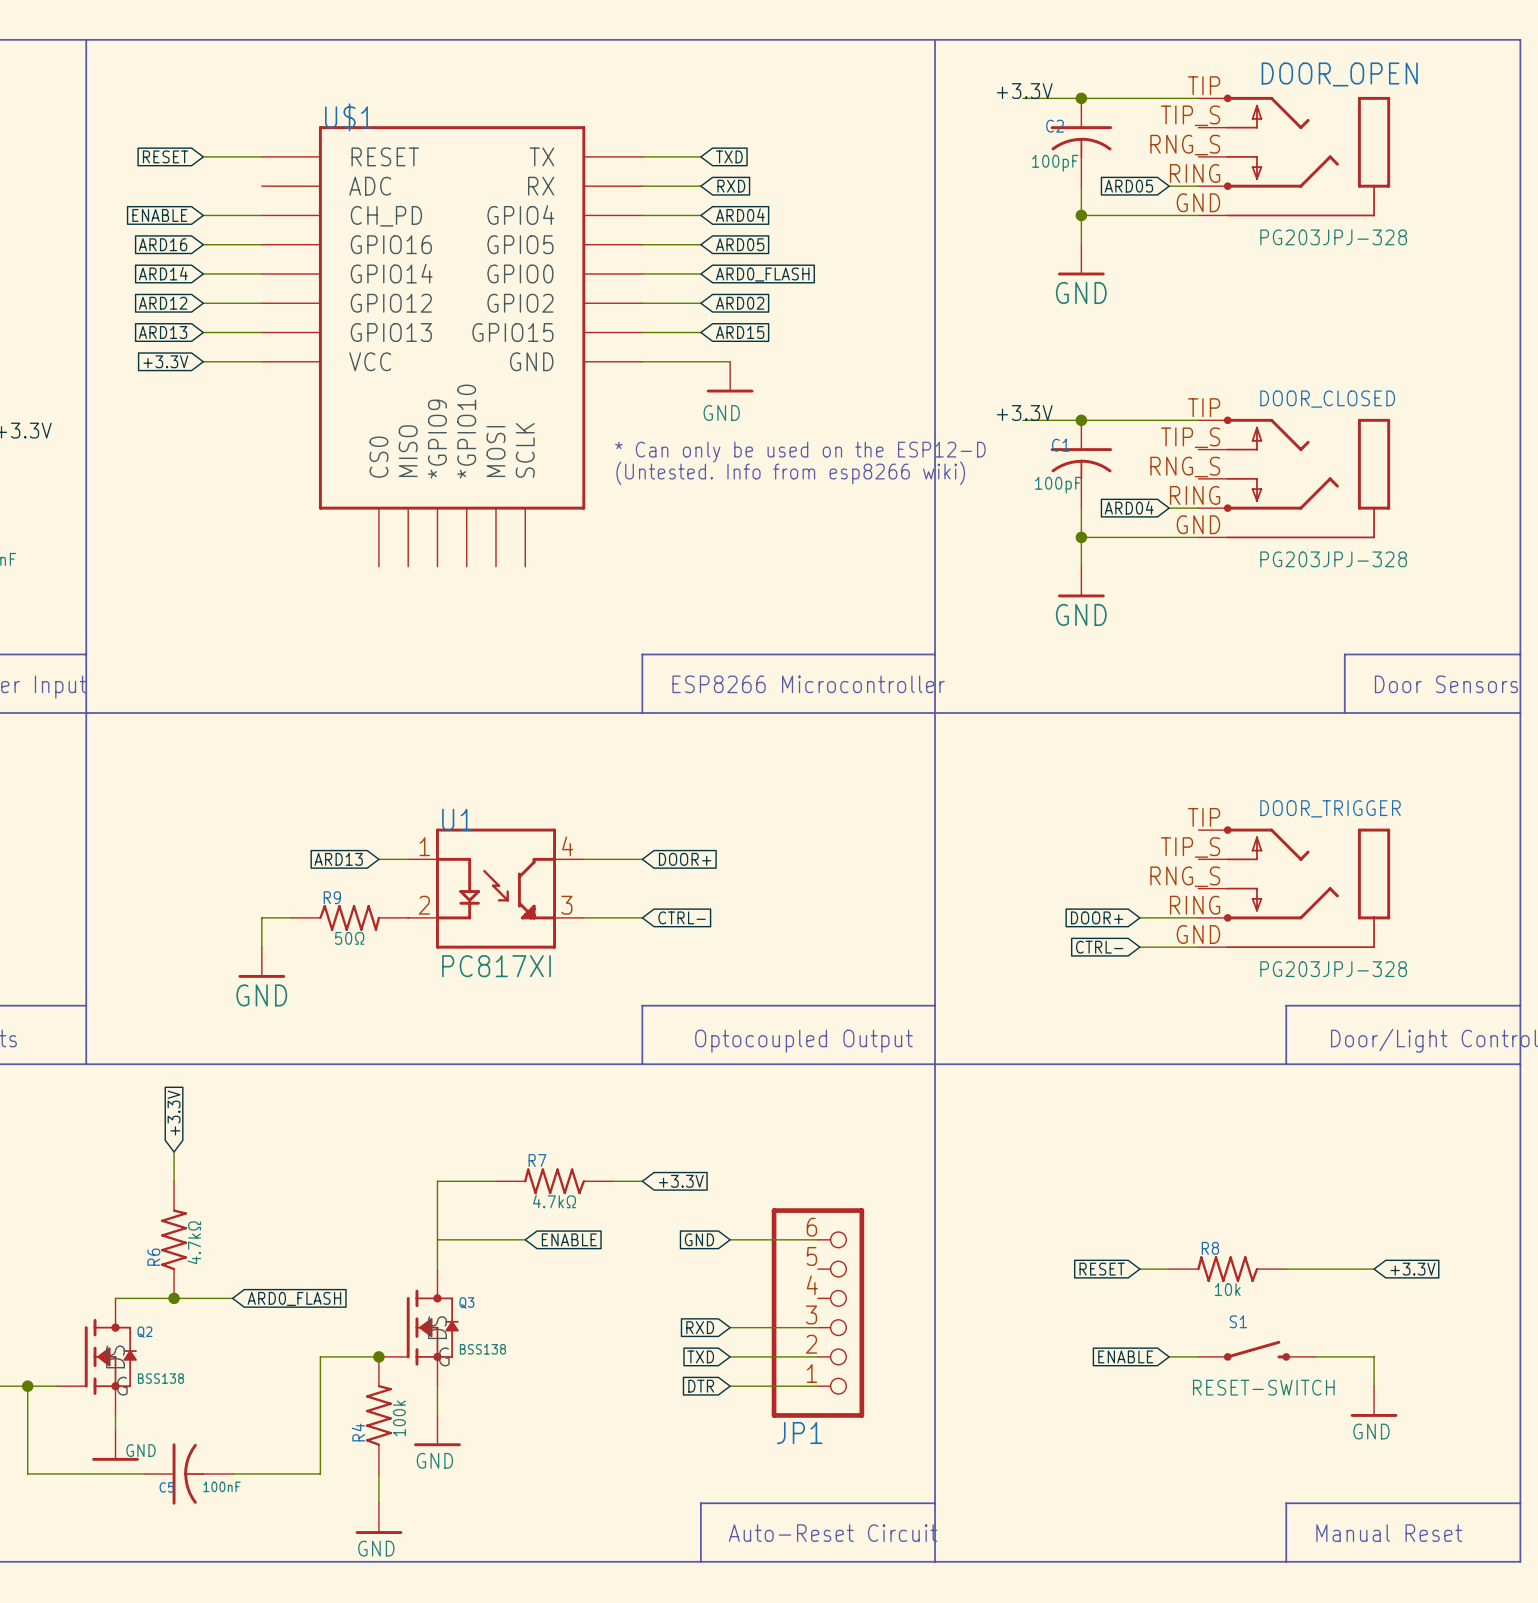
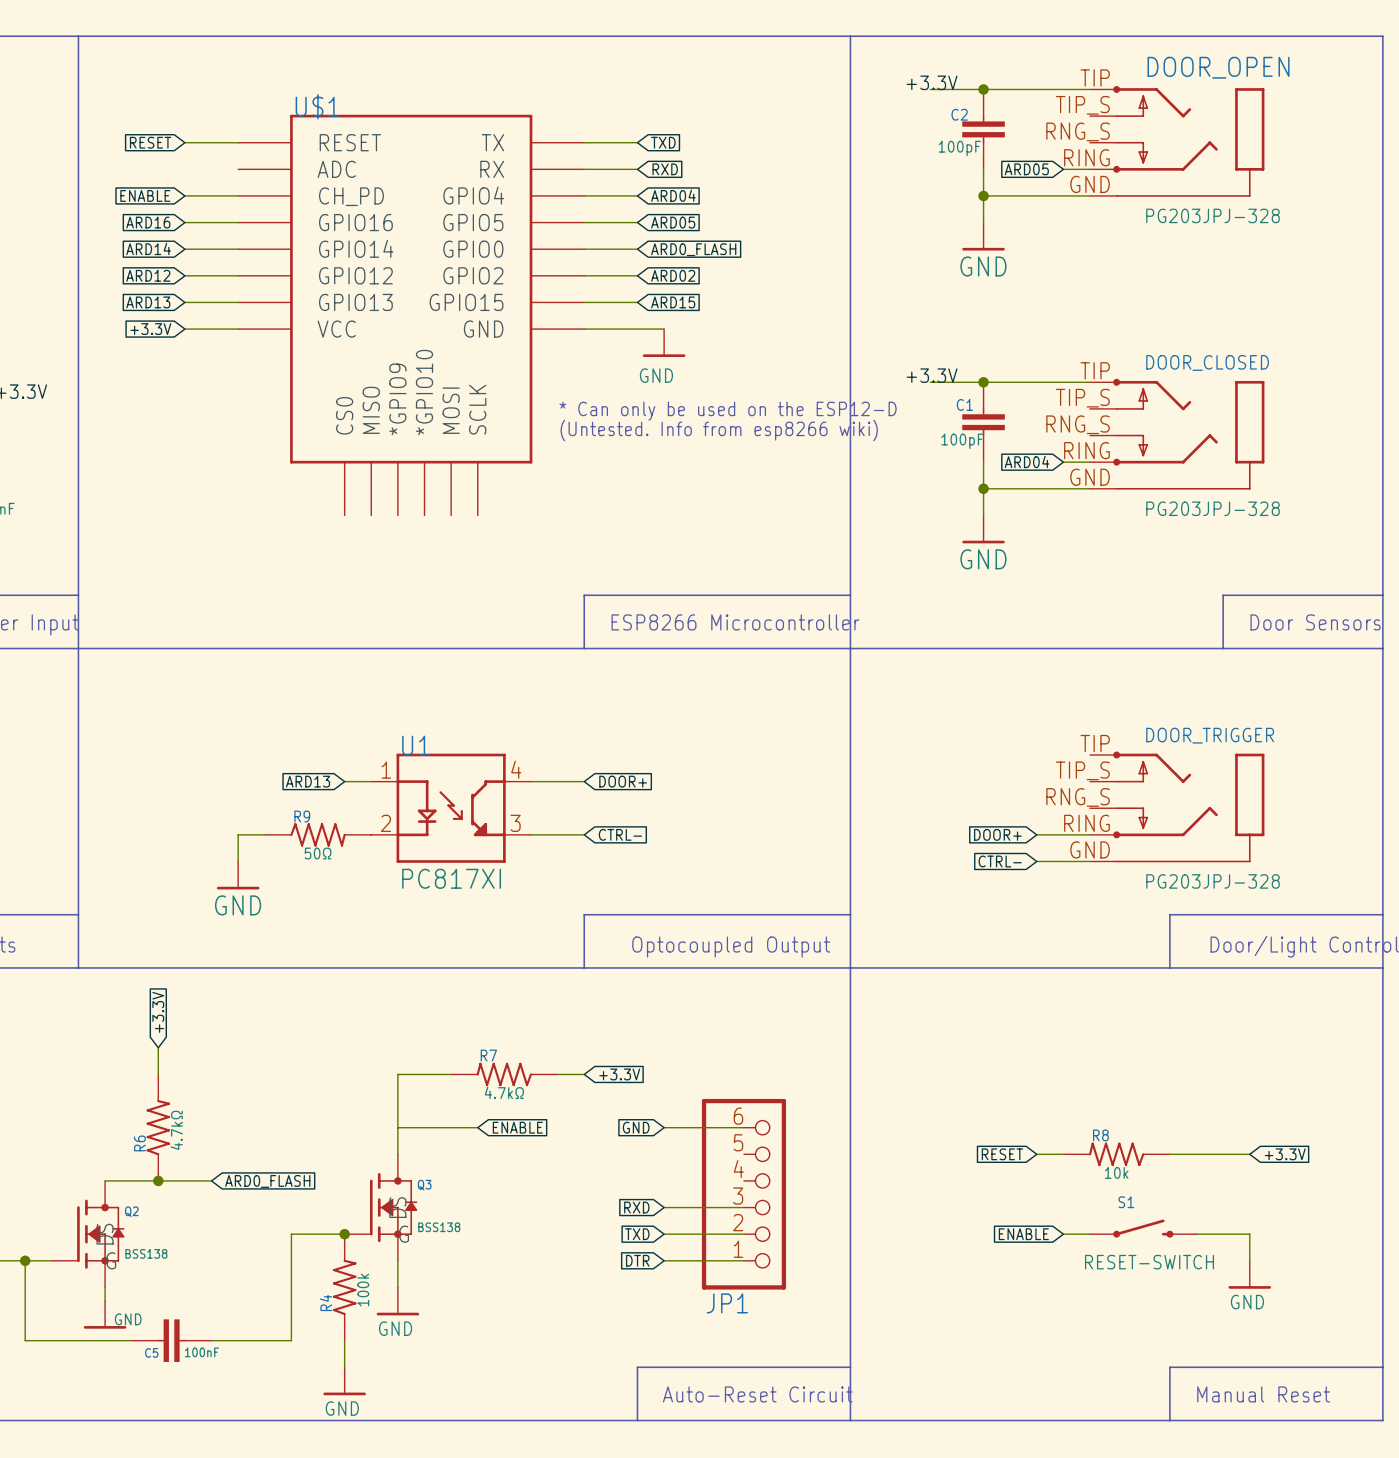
C2 symbol: [1050, 98, 1113, 187] -> [962, 89, 1005, 170]
C1 symbol: [1050, 420, 1113, 509] -> [962, 382, 1005, 463]
C5 symbol: [144, 1443, 233, 1505] -> [131, 1319, 212, 1362]

